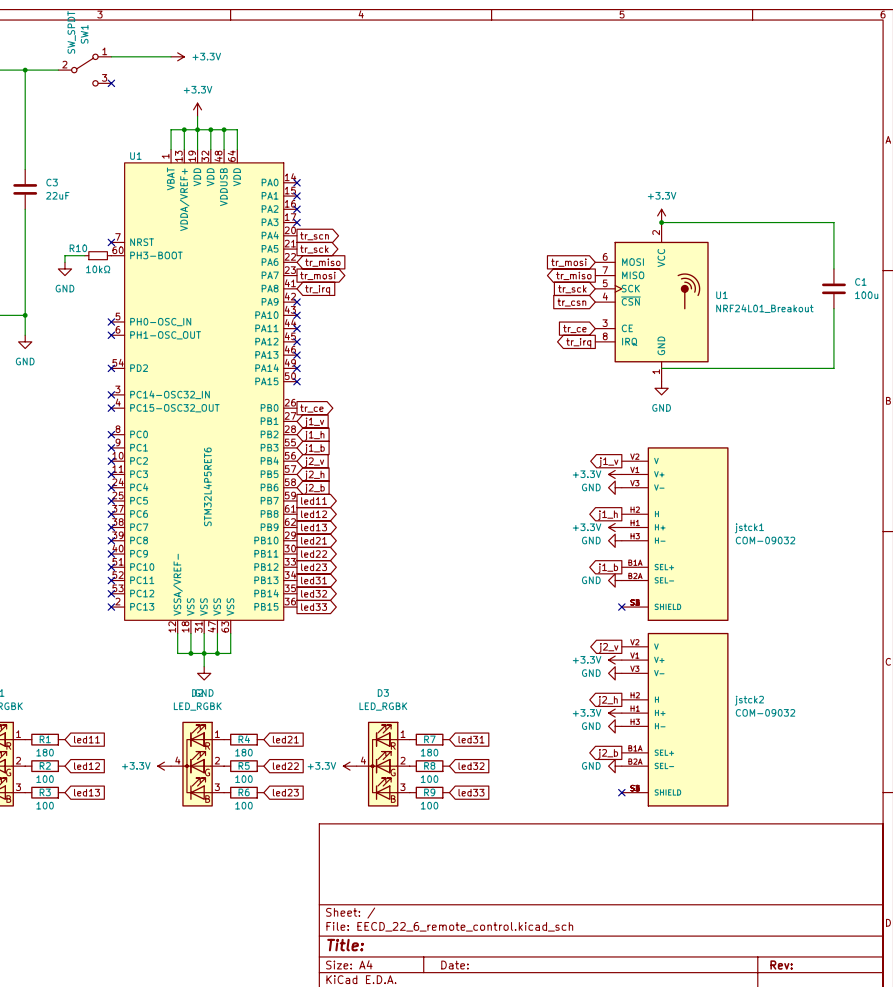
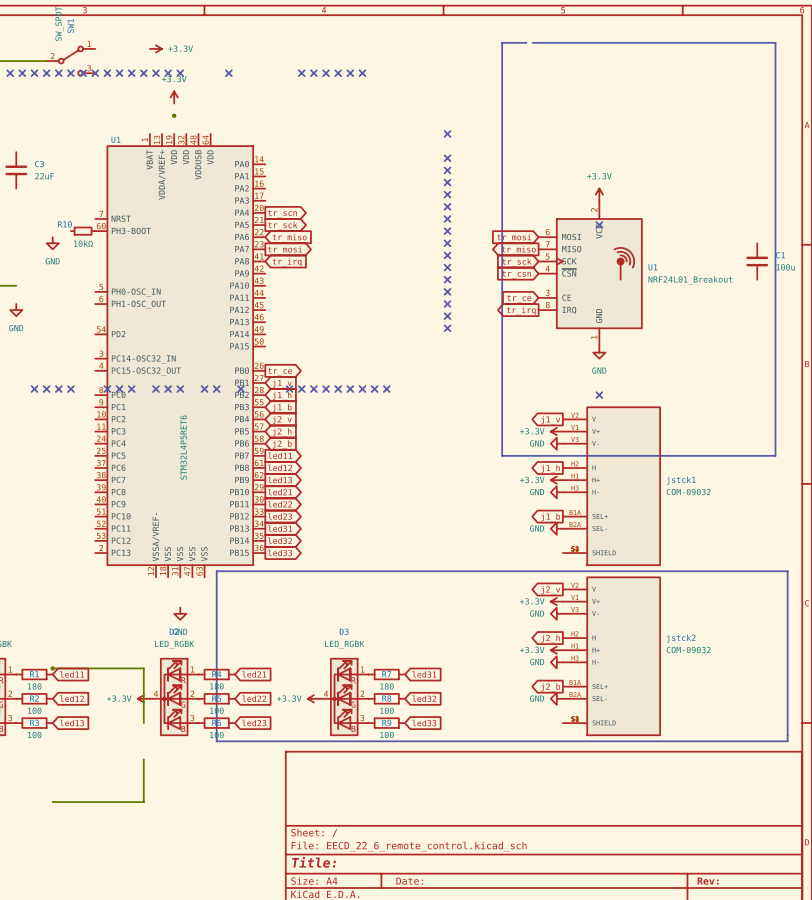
line: none -> (526, 42) (502, 42) (502, 455) (775, 455) (775, 42) (532, 42)
wire: (111, 56) (171, 56) -> none
wire: (25, 70) (25, 169) -> none
junction: (25, 70) -> none
no-connect mark: none -> (10, 73)
no-connect mark: none -> (22, 73)
no-connect mark: none -> (34, 73)
no-connect mark: none -> (46, 73)
no-connect mark: none -> (58, 73)
no-connect mark: none -> (70, 73)
no-connect mark: none -> (83, 73)
no-connect mark: none -> (107, 73)
no-connect mark: none -> (119, 73)
no-connect mark: none -> (131, 73)
no-connect mark: none -> (143, 73)
no-connect mark: none -> (155, 73)
no-connect mark: none -> (168, 73)
no-connect mark: none -> (180, 73)
no-connect mark: none -> (228, 73)
no-connect mark: none -> (301, 73)
no-connect mark: none -> (313, 73)
no-connect mark: none -> (326, 73)
no-connect mark: none -> (338, 73)
no-connect mark: none -> (350, 73)
no-connect mark: none -> (362, 73)
wire: (197, 116) (197, 149) -> none
wire: (184, 129) (184, 149) -> none
junction: (184, 129) -> none
wire: (210, 129) (210, 149) -> none
junction: (210, 129) -> none
wire: (224, 129) (224, 149) -> none
junction: (224, 129) -> none
wire: (171, 149) (171, 129) (237, 129) (237, 149) -> none
no-connect mark: none -> (447, 133)
no-connect mark: none -> (447, 158)
no-connect mark: (297, 182) -> none
no-connect mark: none -> (447, 170)
no-connect mark: (297, 196) -> none
no-connect mark: none -> (447, 182)
wire: (25, 209) (25, 335) -> none
no-connect mark: (297, 209) -> none
no-connect mark: none -> (447, 194)
no-connect mark: (297, 222) -> none
wire: (661, 222) (833, 222) (833, 268) -> none
junction: (661, 222) -> none
no-connect mark: none -> (447, 206)
no-connect mark: (111, 242) -> none
no-connect mark: none -> (447, 218)
no-connect mark: none -> (599, 225)
wire: (84, 255) (64, 255) (64, 262) -> none
no-connect mark: none -> (447, 231)
no-connect mark: none -> (447, 243)
no-connect mark: none -> (447, 255)
no-connect mark: none -> (447, 267)
no-connect mark: (297, 302) -> none
no-connect mark: none -> (447, 279)
wire: (833, 308) (833, 368) (661, 368) -> none
junction: (25, 315) -> none
no-connect mark: (297, 315) -> none
no-connect mark: (111, 321) -> none
no-connect mark: none -> (447, 291)
no-connect mark: (297, 328) -> none
no-connect mark: (111, 335) -> none
no-connect mark: none -> (447, 304)
no-connect mark: (297, 341) -> none
no-connect mark: none -> (447, 316)
no-connect mark: (297, 355) -> none
no-connect mark: none -> (447, 328)
no-connect mark: (111, 368) -> none
no-connect mark: (297, 368) -> none
no-connect mark: (297, 381) -> none
no-connect mark: (111, 394) -> none
no-connect mark: (111, 408) -> none
no-connect mark: none -> (34, 389)
no-connect mark: none -> (46, 389)
no-connect mark: none -> (58, 389)
no-connect mark: none -> (70, 389)
no-connect mark: none -> (107, 389)
no-connect mark: none -> (119, 389)
no-connect mark: none -> (131, 389)
no-connect mark: none -> (155, 389)
no-connect mark: none -> (168, 389)
no-connect mark: none -> (180, 389)
no-connect mark: none -> (204, 389)
no-connect mark: none -> (216, 389)
no-connect mark: none -> (240, 389)
no-connect mark: none -> (289, 389)
no-connect mark: none -> (301, 389)
no-connect mark: none -> (313, 389)
no-connect mark: none -> (326, 389)
no-connect mark: none -> (338, 389)
no-connect mark: none -> (350, 389)
no-connect mark: none -> (362, 389)
no-connect mark: none -> (374, 389)
no-connect mark: none -> (386, 389)
no-connect mark: (111, 434) -> none
no-connect mark: none -> (599, 395)
no-connect mark: (111, 447) -> none
no-connect mark: (111, 461) -> none
no-connect mark: (111, 474) -> none
no-connect mark: (111, 487) -> none
no-connect mark: (111, 500) -> none
no-connect mark: (111, 514) -> none
no-connect mark: (111, 527) -> none
no-connect mark: (111, 540) -> none
no-connect mark: (111, 554) -> none
no-connect mark: (111, 567) -> none
no-connect mark: (111, 580) -> none
no-connect mark: (111, 593) -> none
no-connect mark: (111, 607) -> none
no-connect mark: (621, 607) -> none
line: none -> (216, 571) (787, 571) (787, 741) (216, 741) (216, 571)
wire: (177, 633) (177, 653) (230, 653) (230, 633) -> none
wire: (190, 633) (190, 653) -> none
wire: (204, 633) (204, 666) -> none
wire: (217, 633) (217, 653) -> none
junction: (190, 653) -> none
junction: (204, 653) -> none
junction: (217, 653) -> none
wire: none -> (52, 668) (143, 668) (143, 723)
junction: none -> (52, 668)
no-connect mark: (621, 792) -> none
wire: none -> (143, 759) (143, 802) (52, 802)

